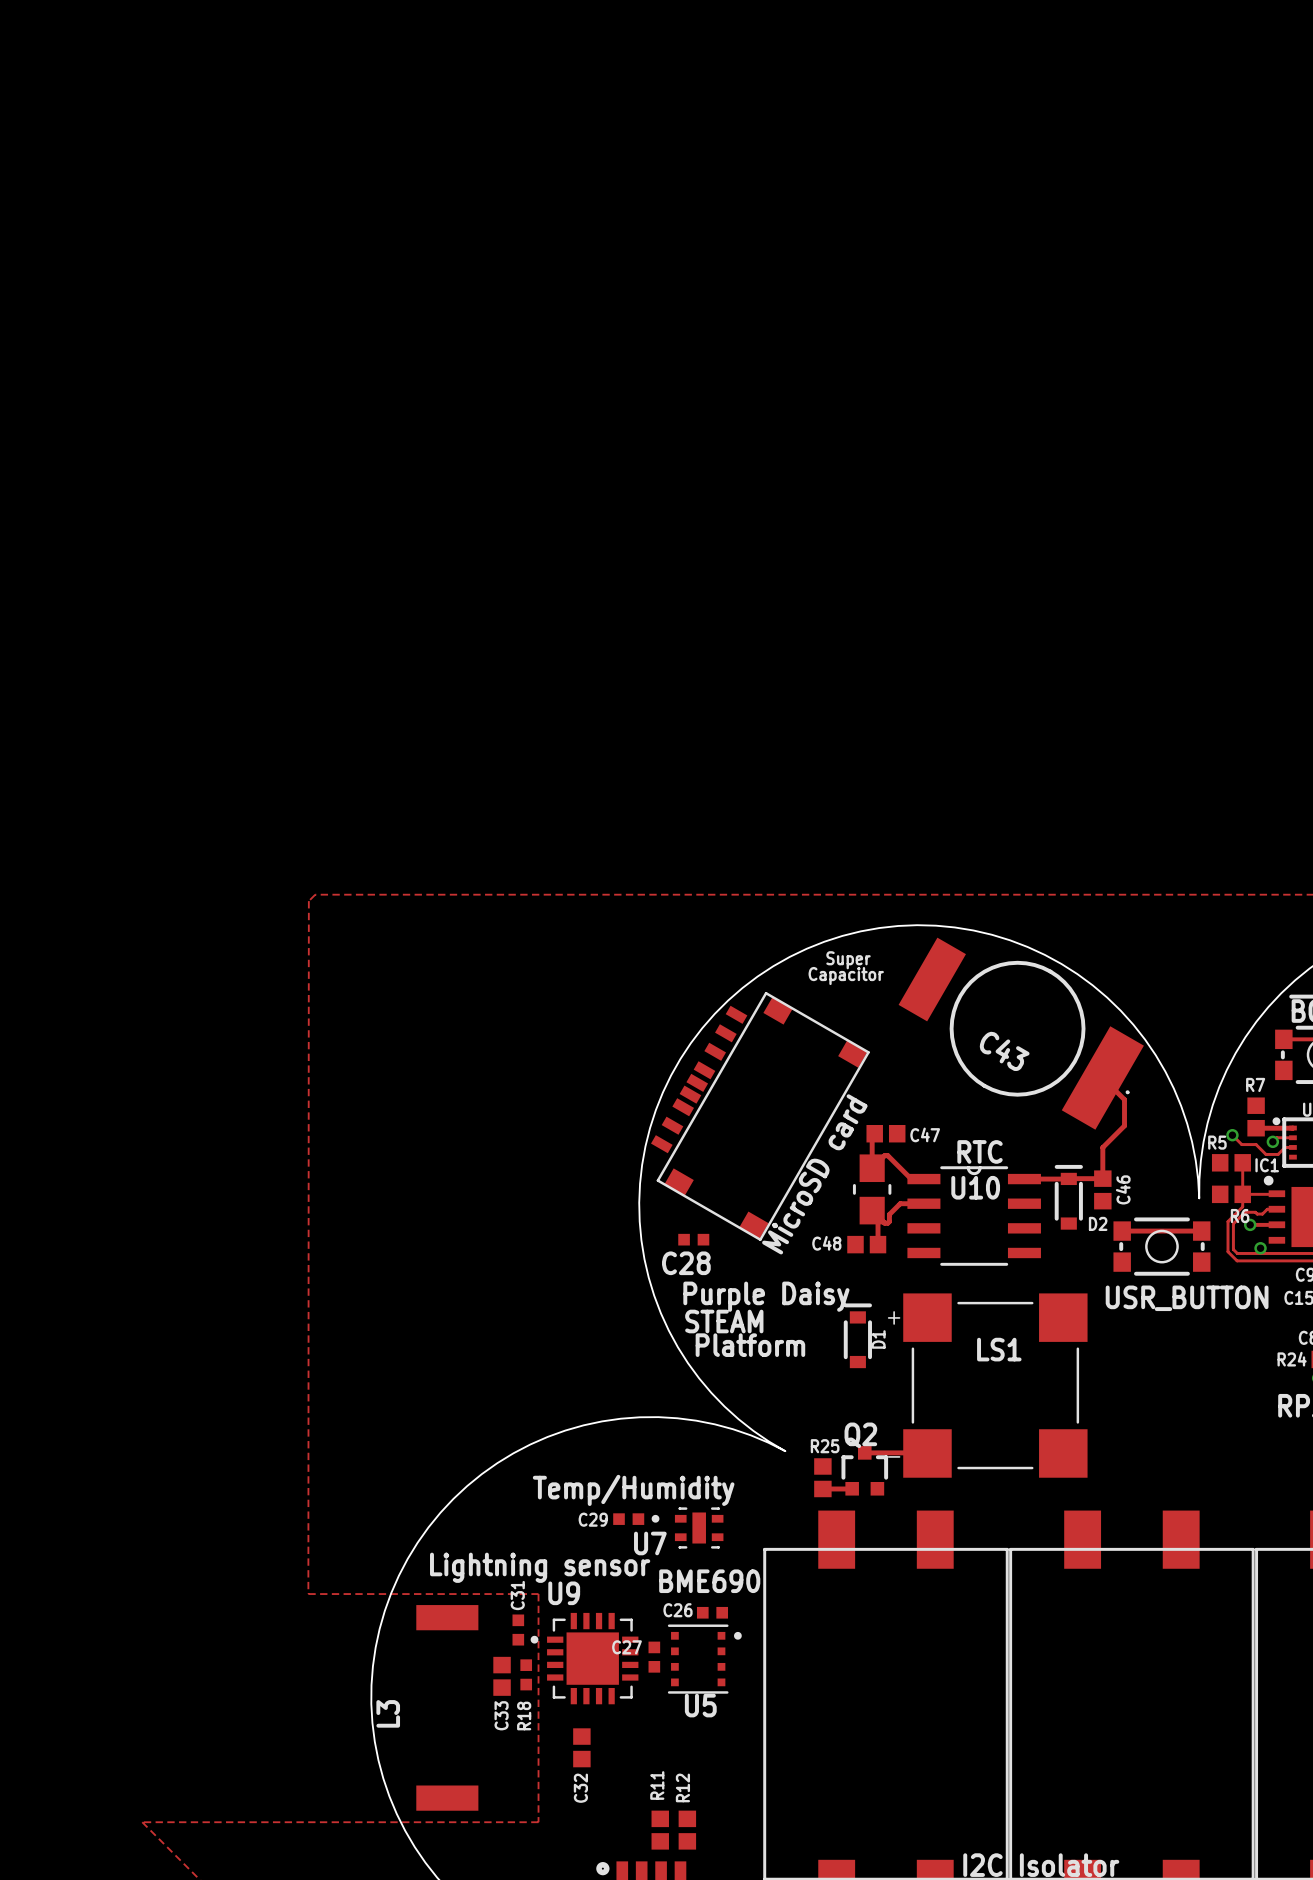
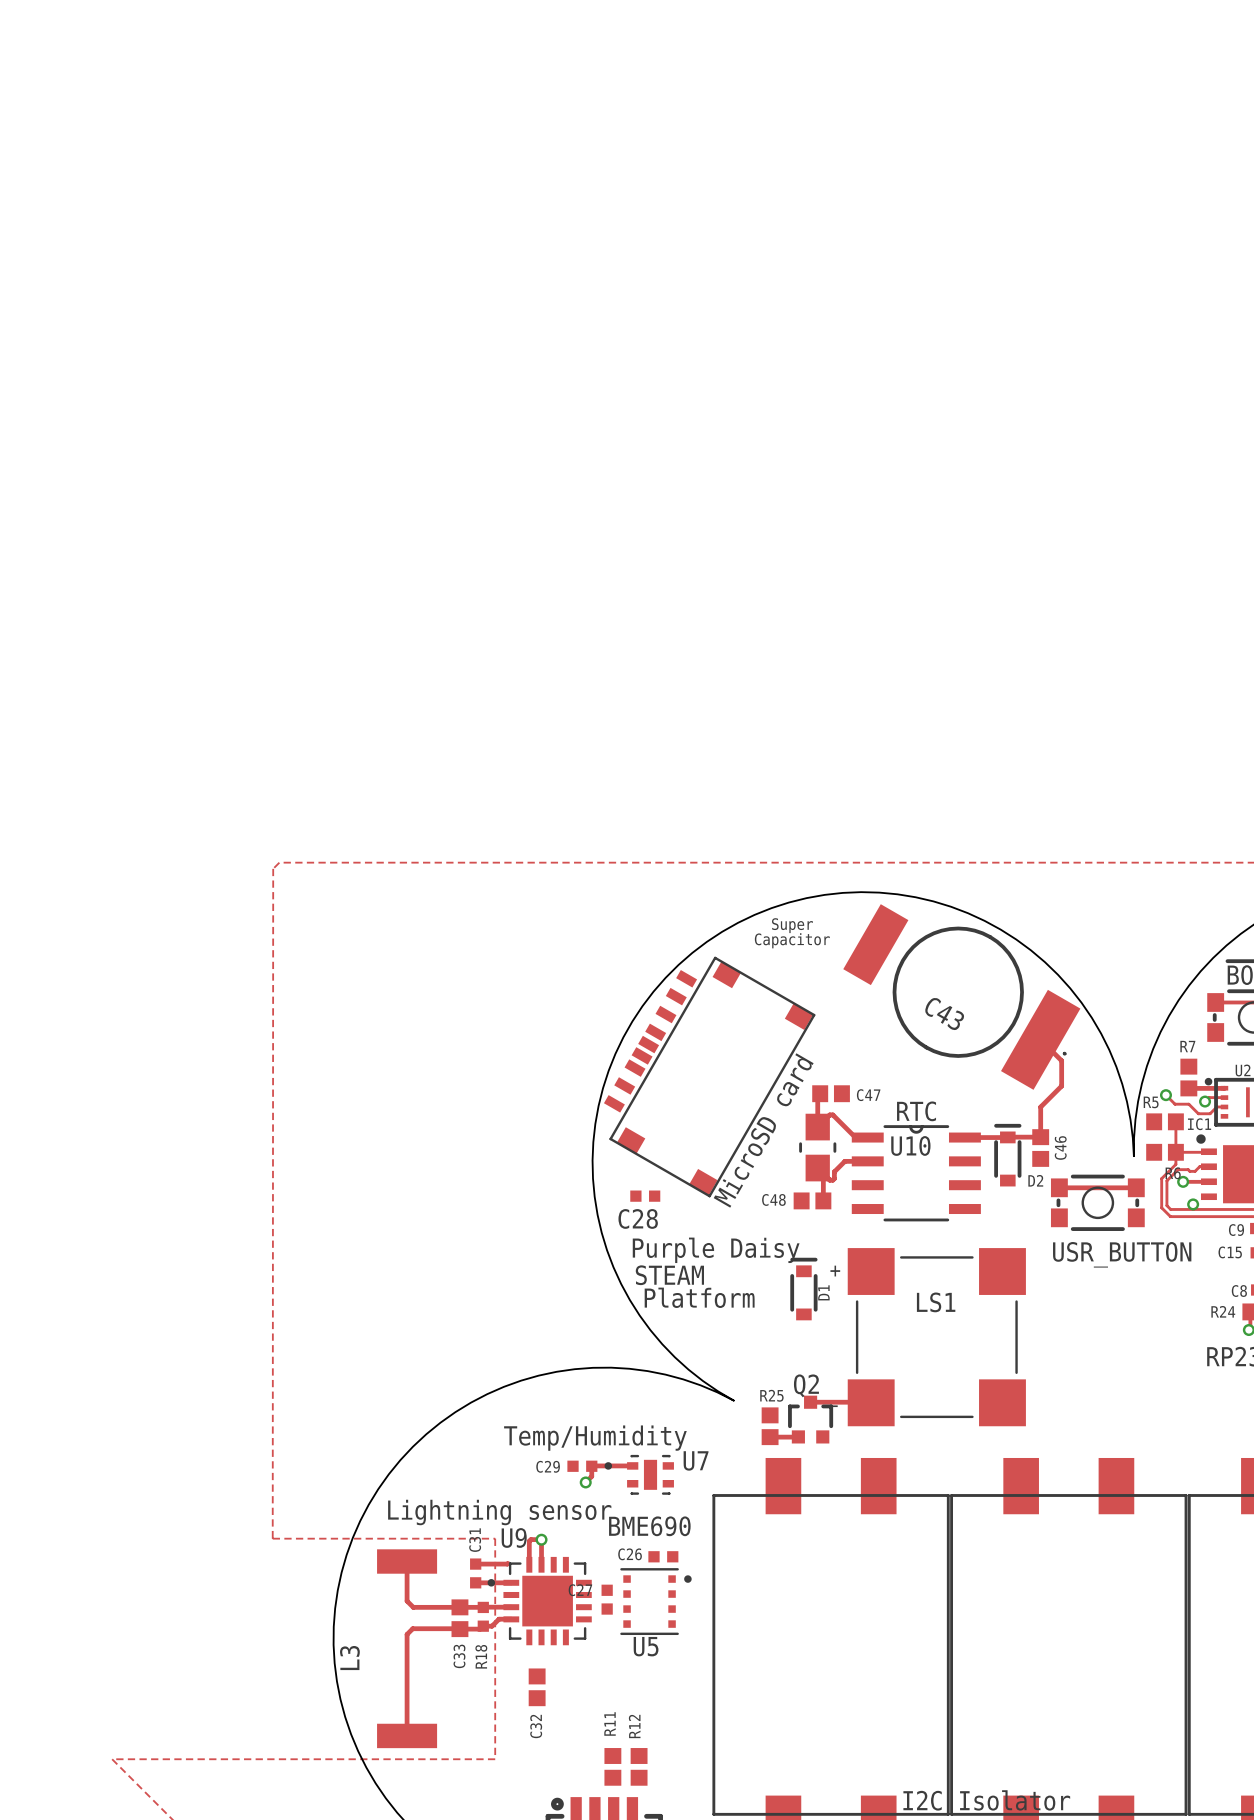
track: none -> (632, 1465) (592, 1465) (591, 1476) (585, 1482)
via: none -> (585, 1482)
U7 name position: U7 (650, 1543) -> U7 (696, 1460)
track: none -> (541, 1539) (529, 1541) (529, 1564)
track: none -> (541, 1539) (541, 1564)
via: none -> (541, 1539)
track: none -> (407, 1561) (407, 1601) (413, 1607) (483, 1607)
track: none -> (508, 1563) (475, 1564)
track: none -> (475, 1582) (511, 1582)
track: none -> (483, 1607) (511, 1607)
track: none -> (511, 1619) (499, 1619) (492, 1626) (483, 1626) (480, 1629) (412, 1628) (407, 1634) (407, 1735)

